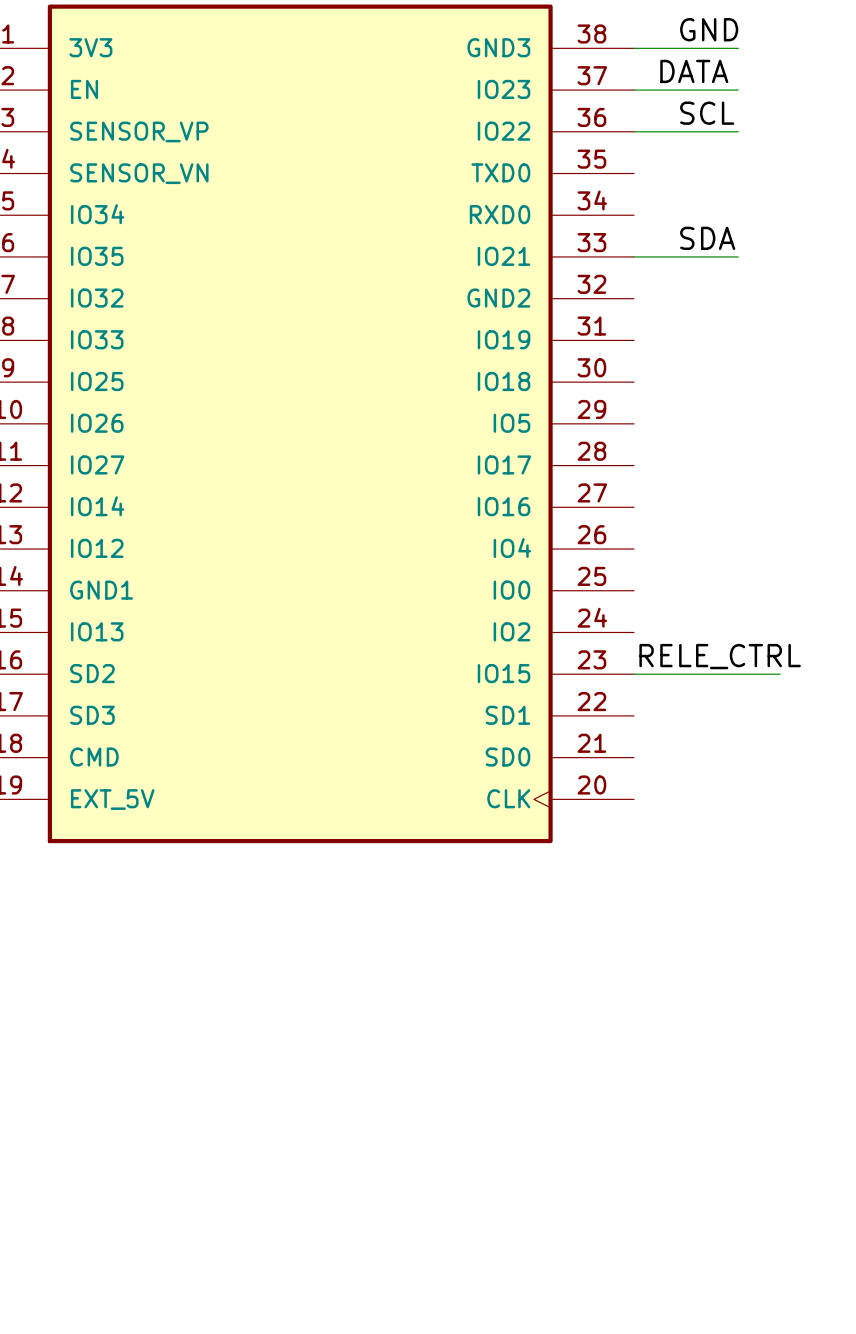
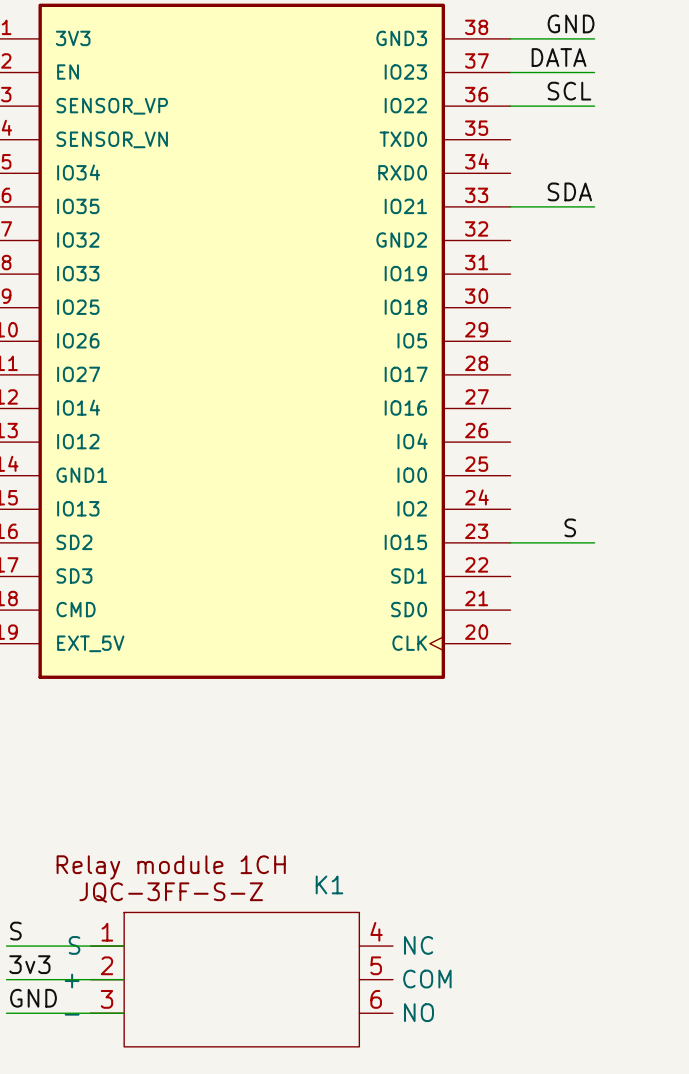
label: none -> S (570, 527)
label: RELE_CTRL (720, 656) -> none
wire: (738, 674) (780, 674) -> none
label: none -> S (15, 931)
wire: none -> (6, 946) (124, 946)
label: none -> 3v3 (29, 964)
wire: none -> (6, 979) (124, 979)
K1: none -> (241, 979)
label: none -> GND (33, 998)
wire: none -> (6, 1013) (124, 1013)

